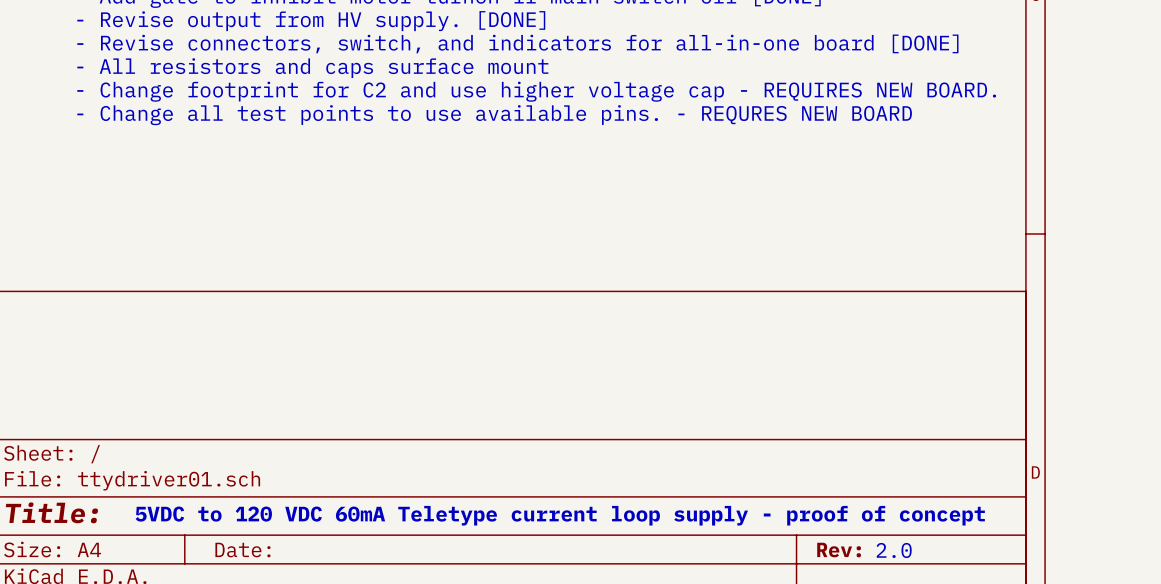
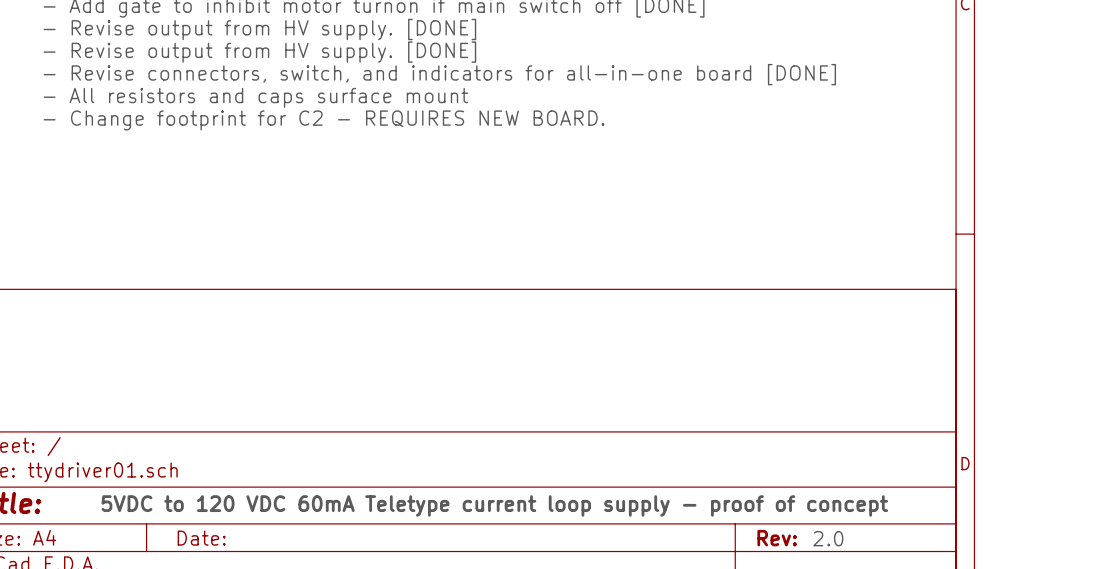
text: - Revise connectors, switch, and indicators for all-in-one board [DONE] (517, 43) -> - Revise output from HV supply. [DONE] (259, 52)
text: - All resistors and caps surface mount (312, 68) -> - Revise connectors, switch, and indicators for all-in-one board [DONE] (439, 74)
text: - Change footprint for C2 and use higher voltage cap - REQUIRES NEW BOARD. (536, 91) -> - All resistors and caps surface mount (255, 97)
text: - Change all test points to use available pins. - REQURES NEW BOARD (494, 115) -> - Change footprint for C2 - REQUIRES NEW BOARD. (323, 120)

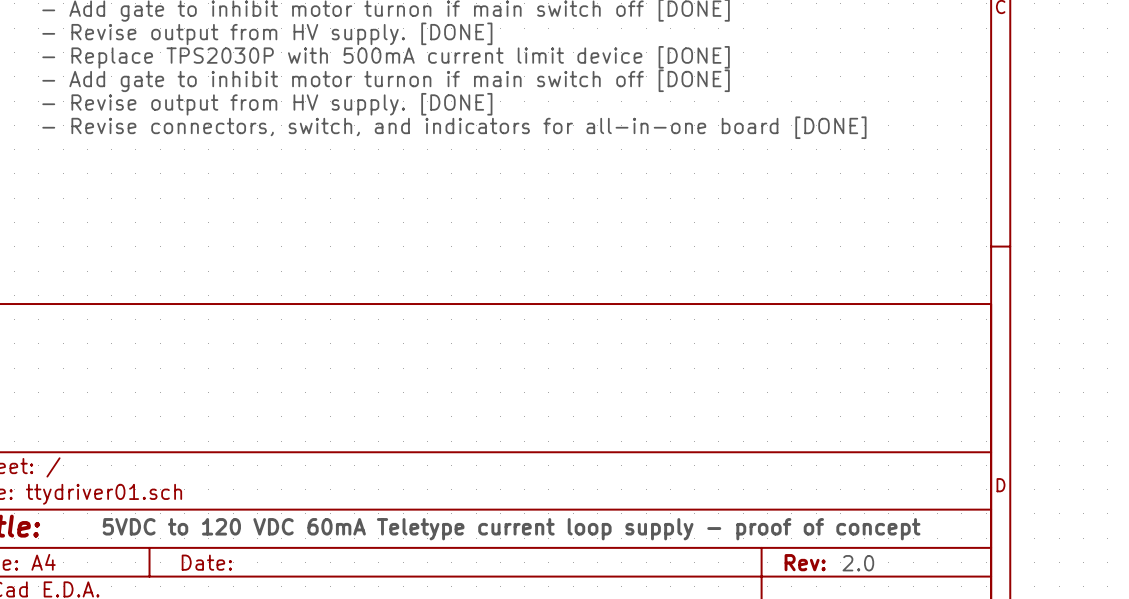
text: - Revise output from HV supply. [DONE] (259, 52) -> - Replace TPS2030P with 500mA current limit device [DONE] (386, 57)
text: - Revise connectors, switch, and indicators for all-in-one board [DONE] (439, 74) -> - Add gate to inhibit motor turnon if main switch off [DONE] (386, 80)
text: - All resistors and caps surface mount (255, 97) -> - Revise output from HV supply. [DONE] (267, 104)
text: - Change footprint for C2 - REQUIRES NEW BOARD. (323, 120) -> - Revise connectors, switch, and indicators for all-in-one board [DONE] (454, 127)

